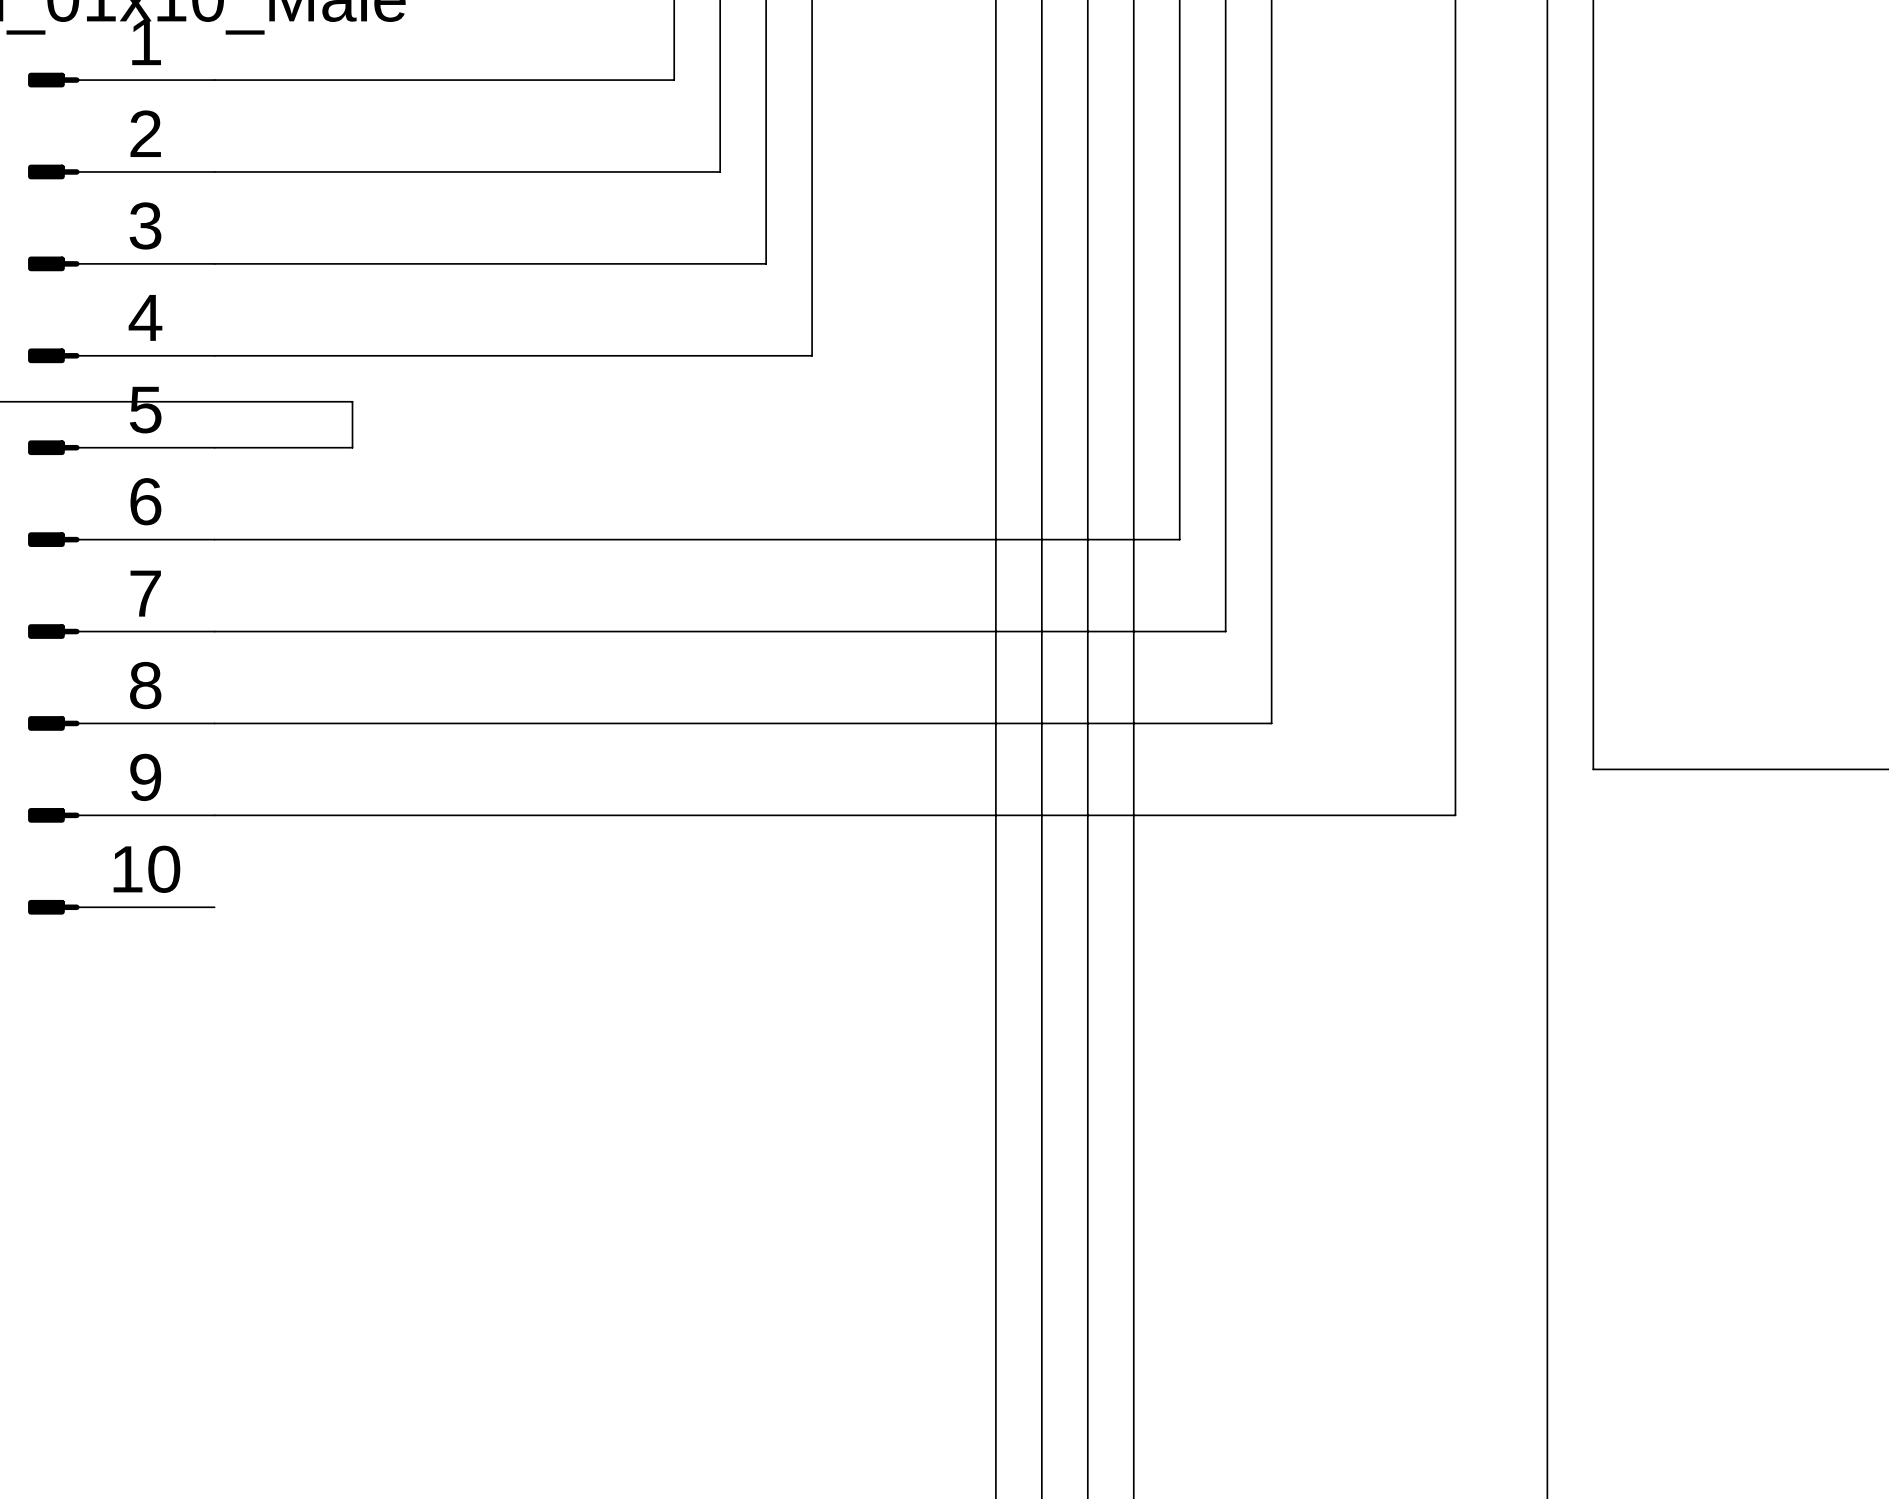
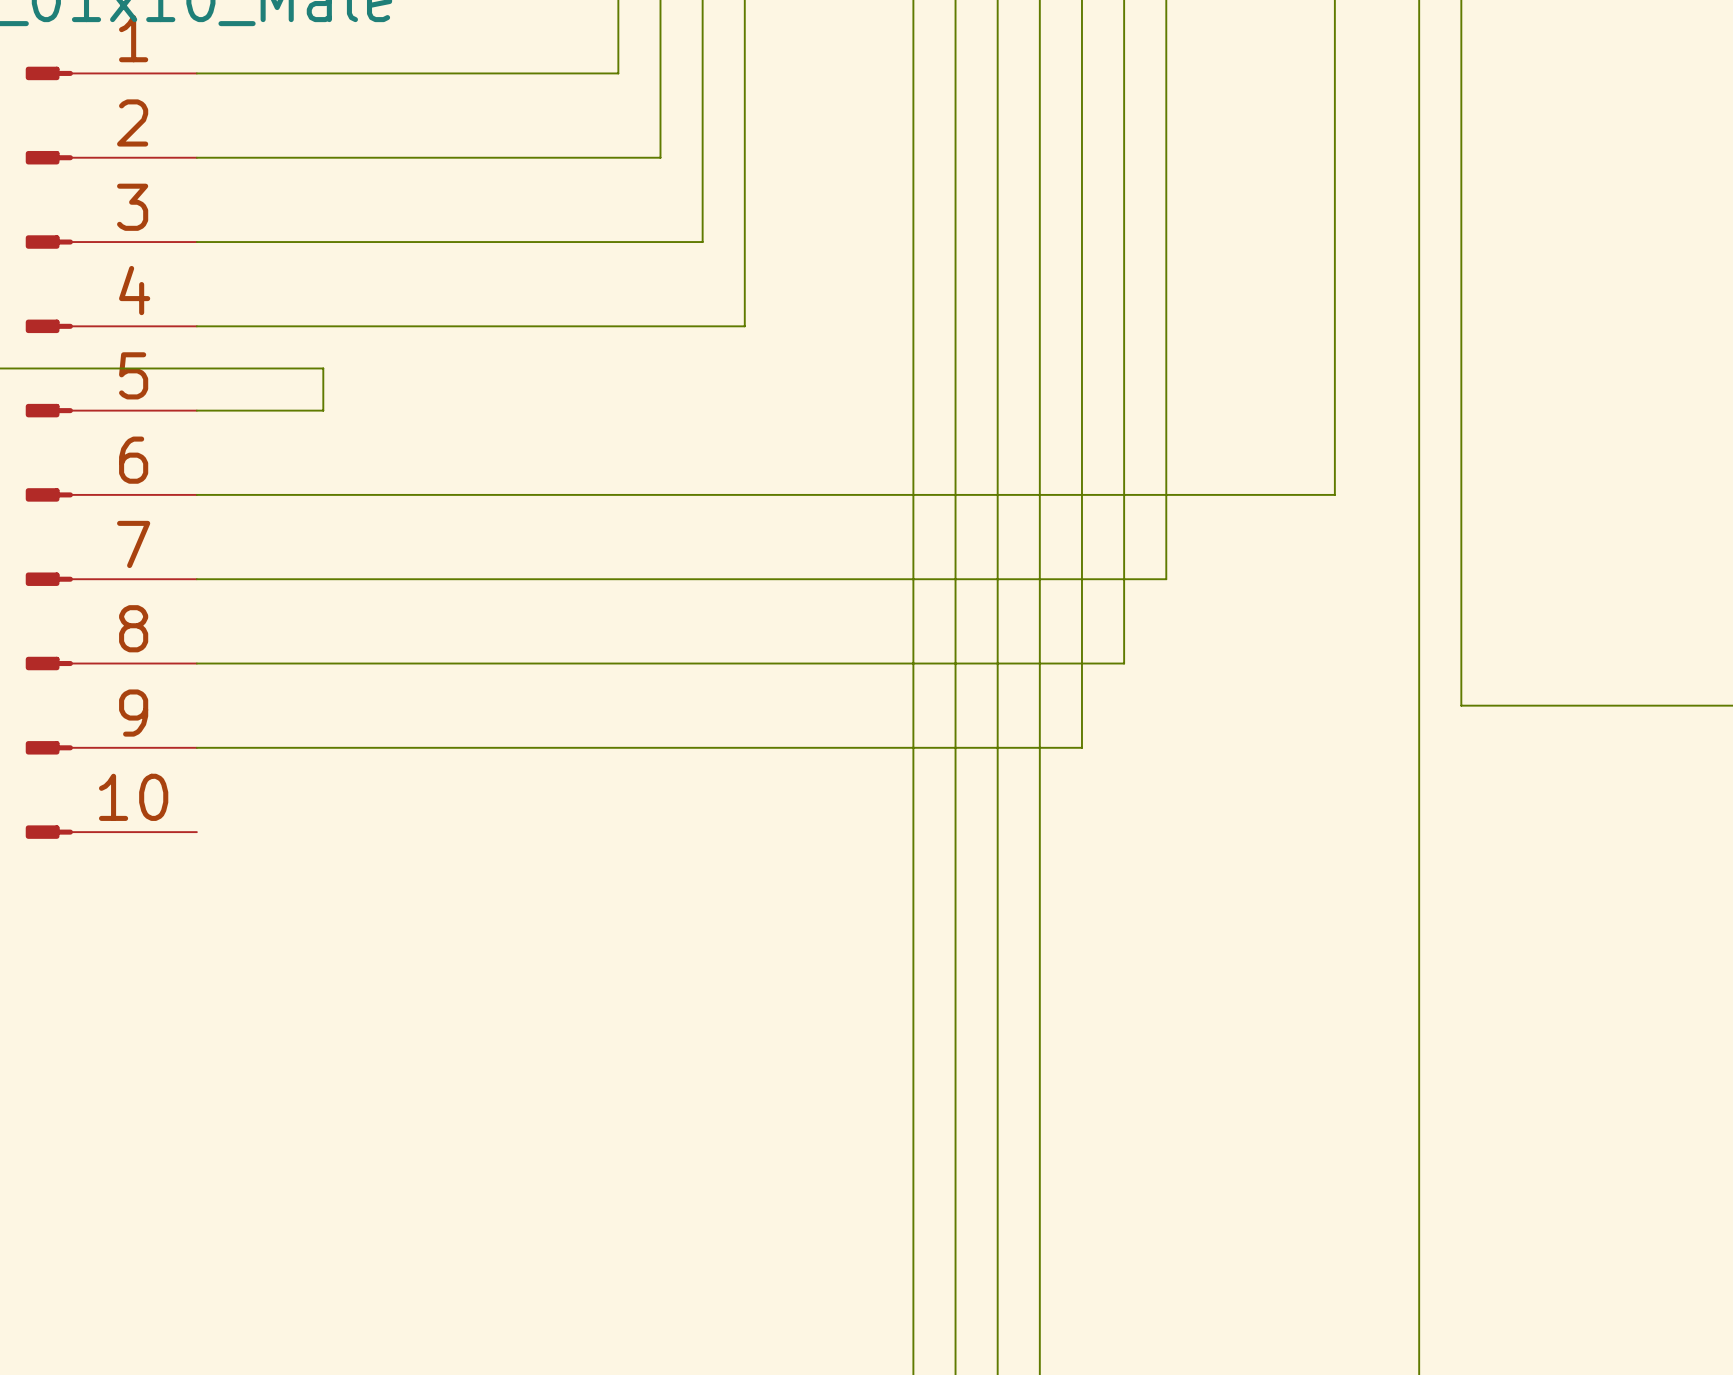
wire: (1455, 539) (1455, 815) (1179, 815) -> (1334, 494) (1081, 494) (1081, 747)
wire: (1271, 631) (1271, 723) (1225, 723) -> (1166, 579) (1124, 579) (1124, 663)

